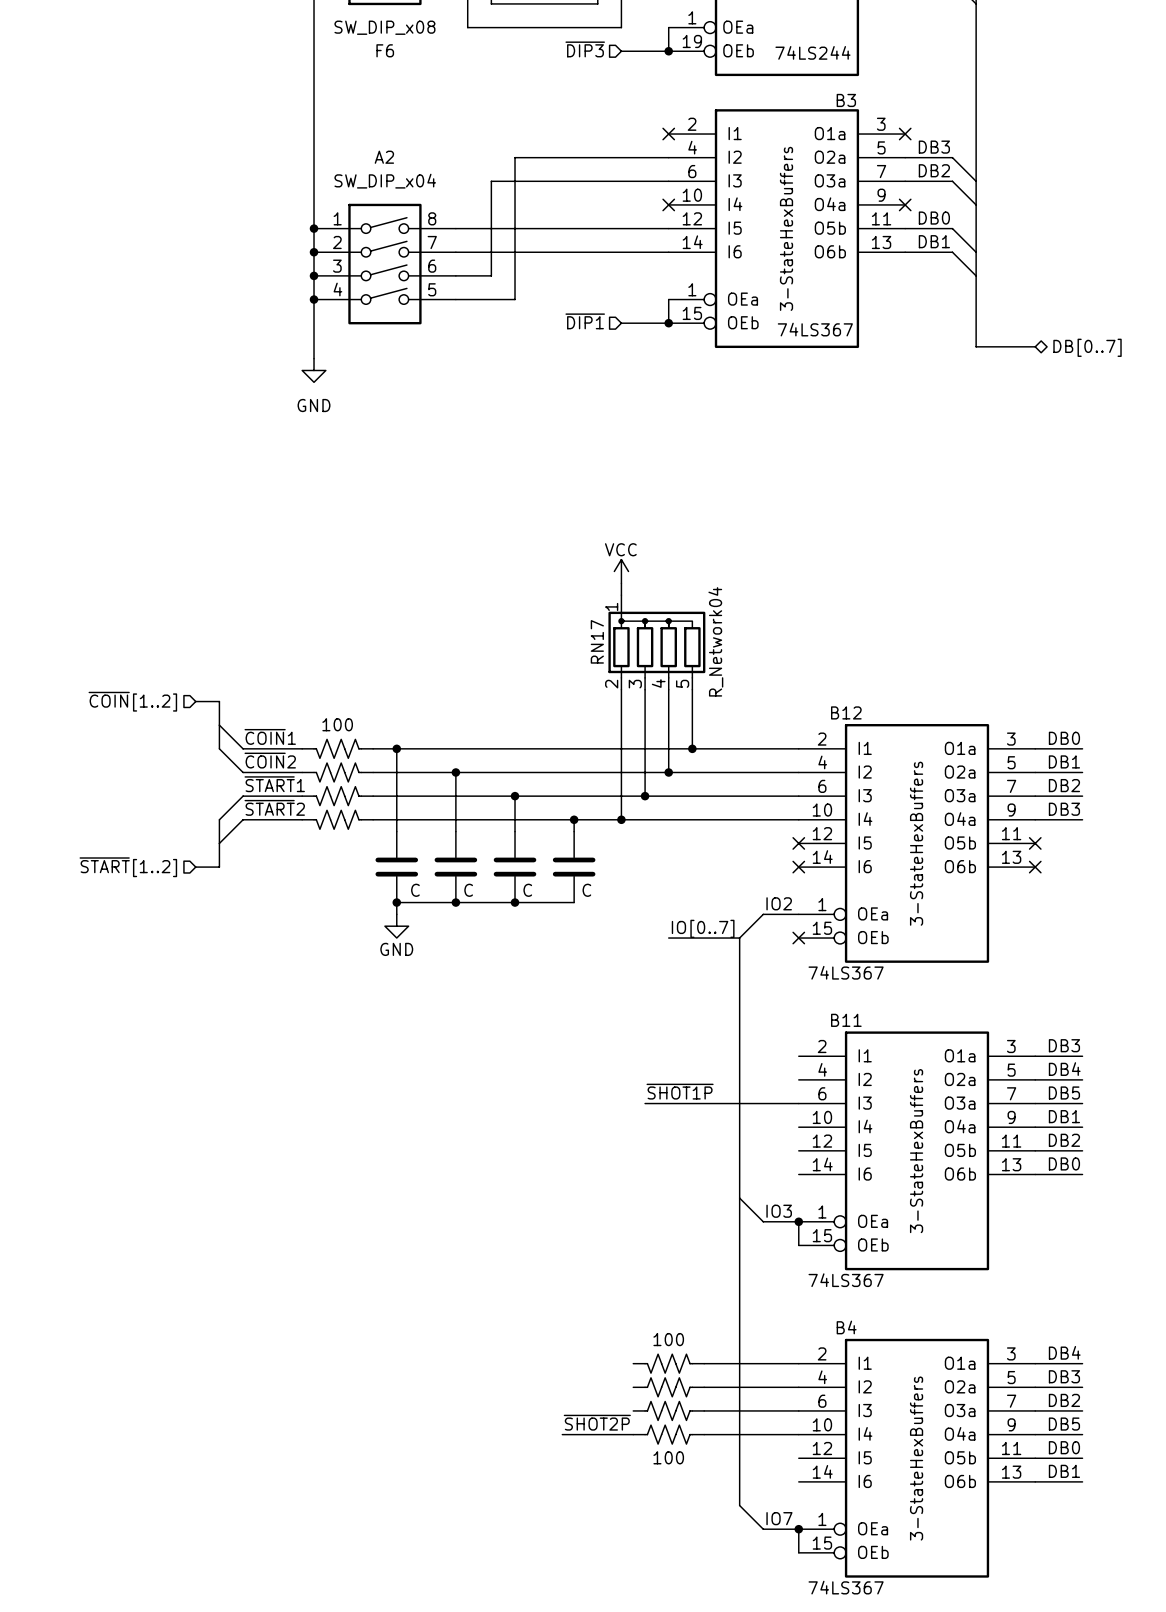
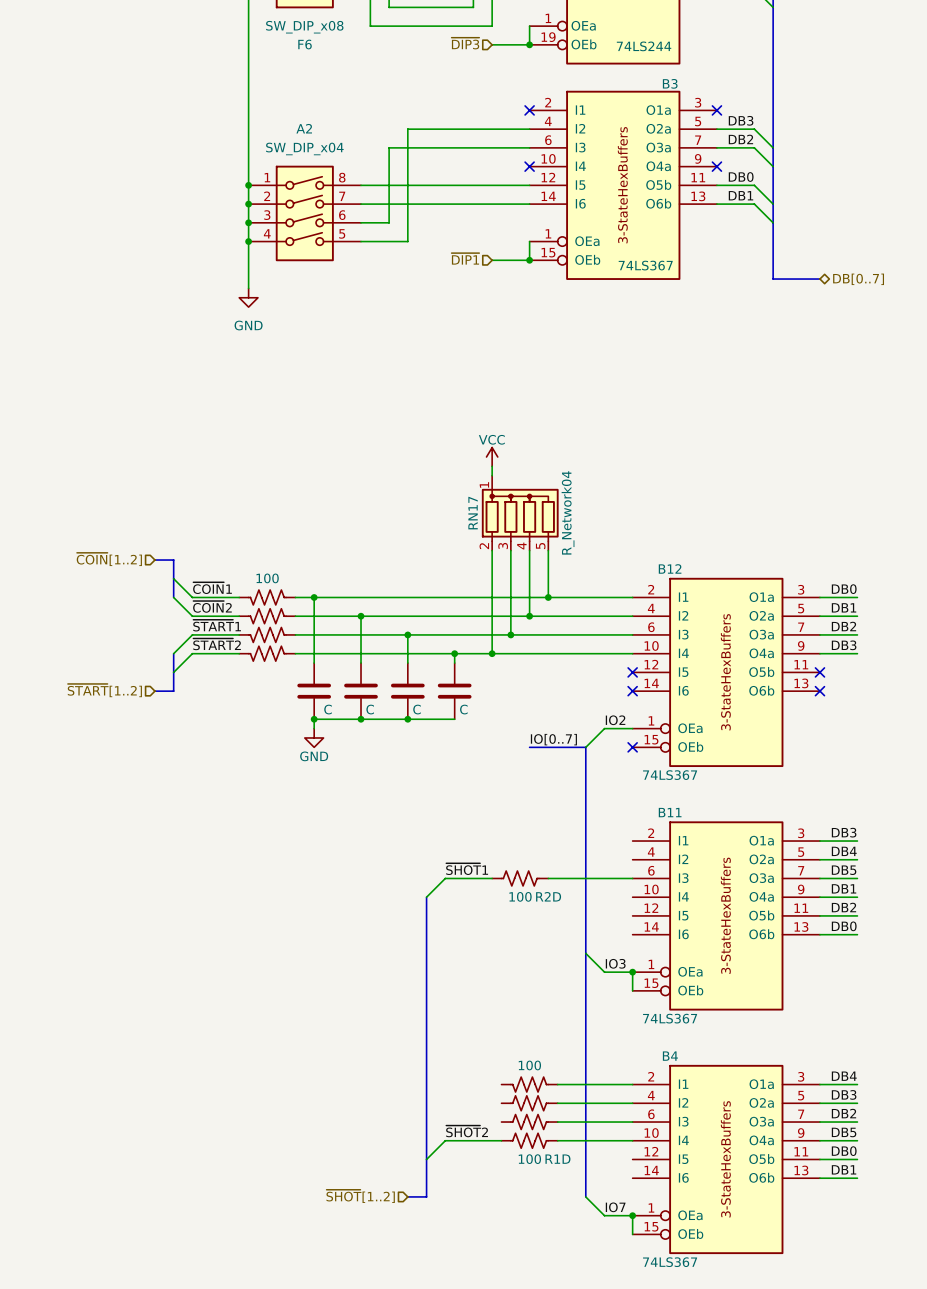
label: ~{SHOT1P} (680, 1091) -> ~{SHOT}1 (467, 869)
wire: none -> (492, 878) (445, 878) (426, 897)
wire: (645, 1103) (692, 1103) -> none
R2D: none -> 100 (520, 878)
bus: none -> (426, 897) (426, 1196) (407, 1196)
label: ~{SHOT2P} (597, 1422) -> ~{SHOT}2 (467, 1131)
wire: none -> (445, 1140) (426, 1159)
R1D name: none -> R1D (557, 1159)
hierarchical label: none -> ~{SHOT}[1..2] (360, 1196)

